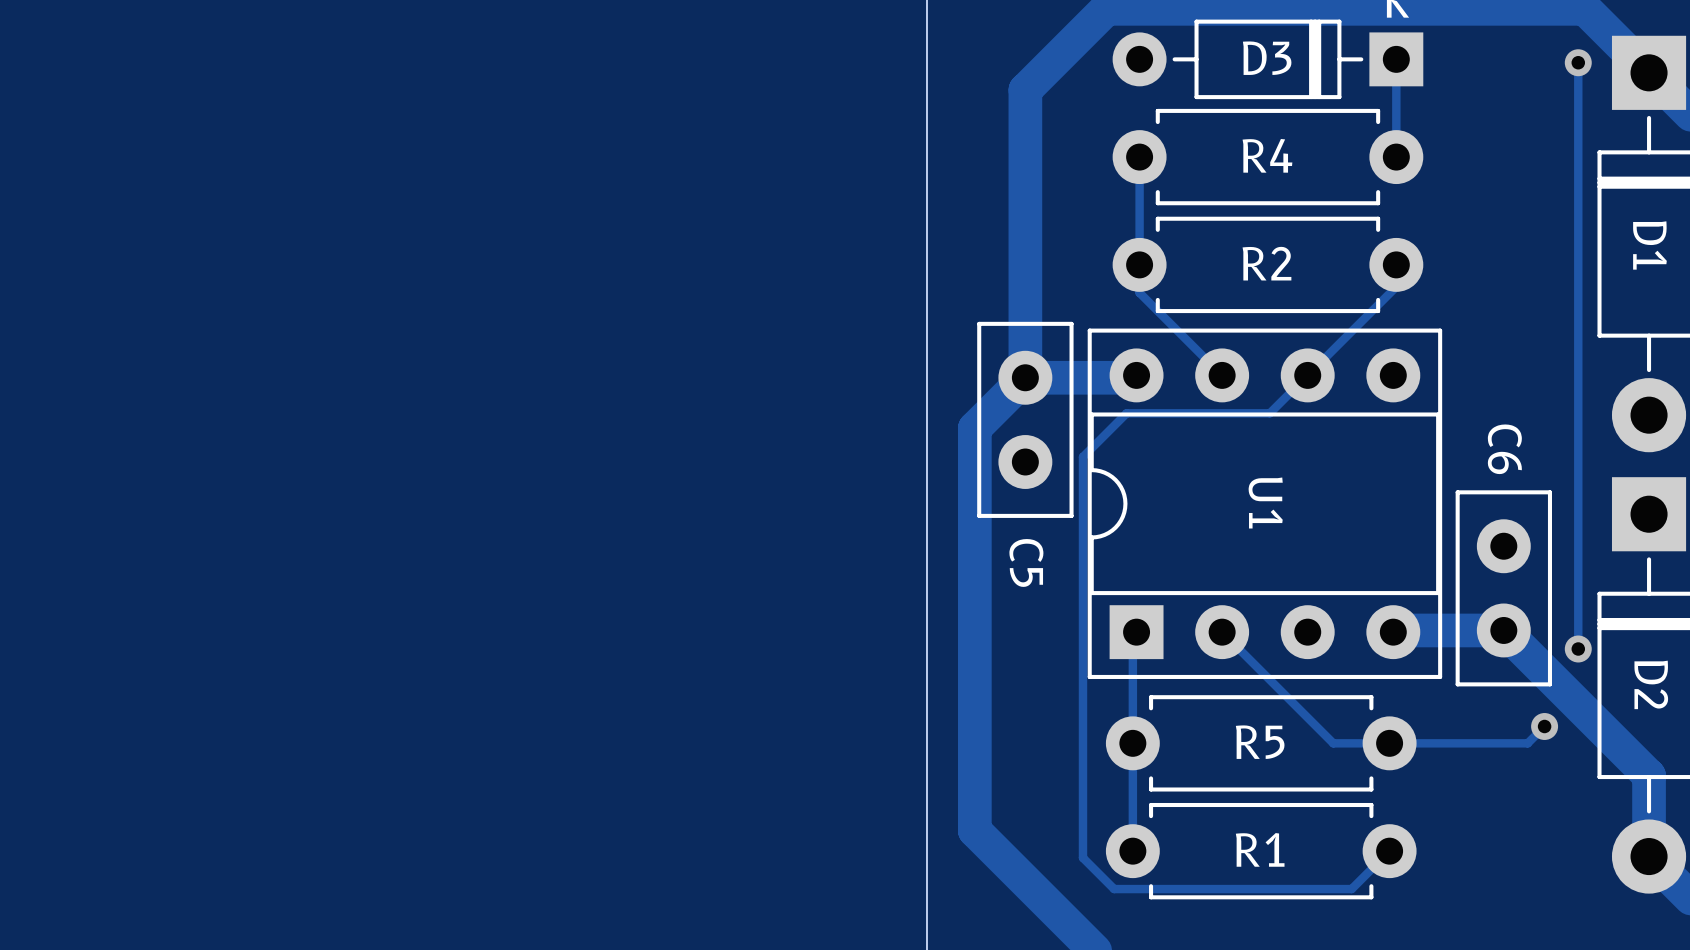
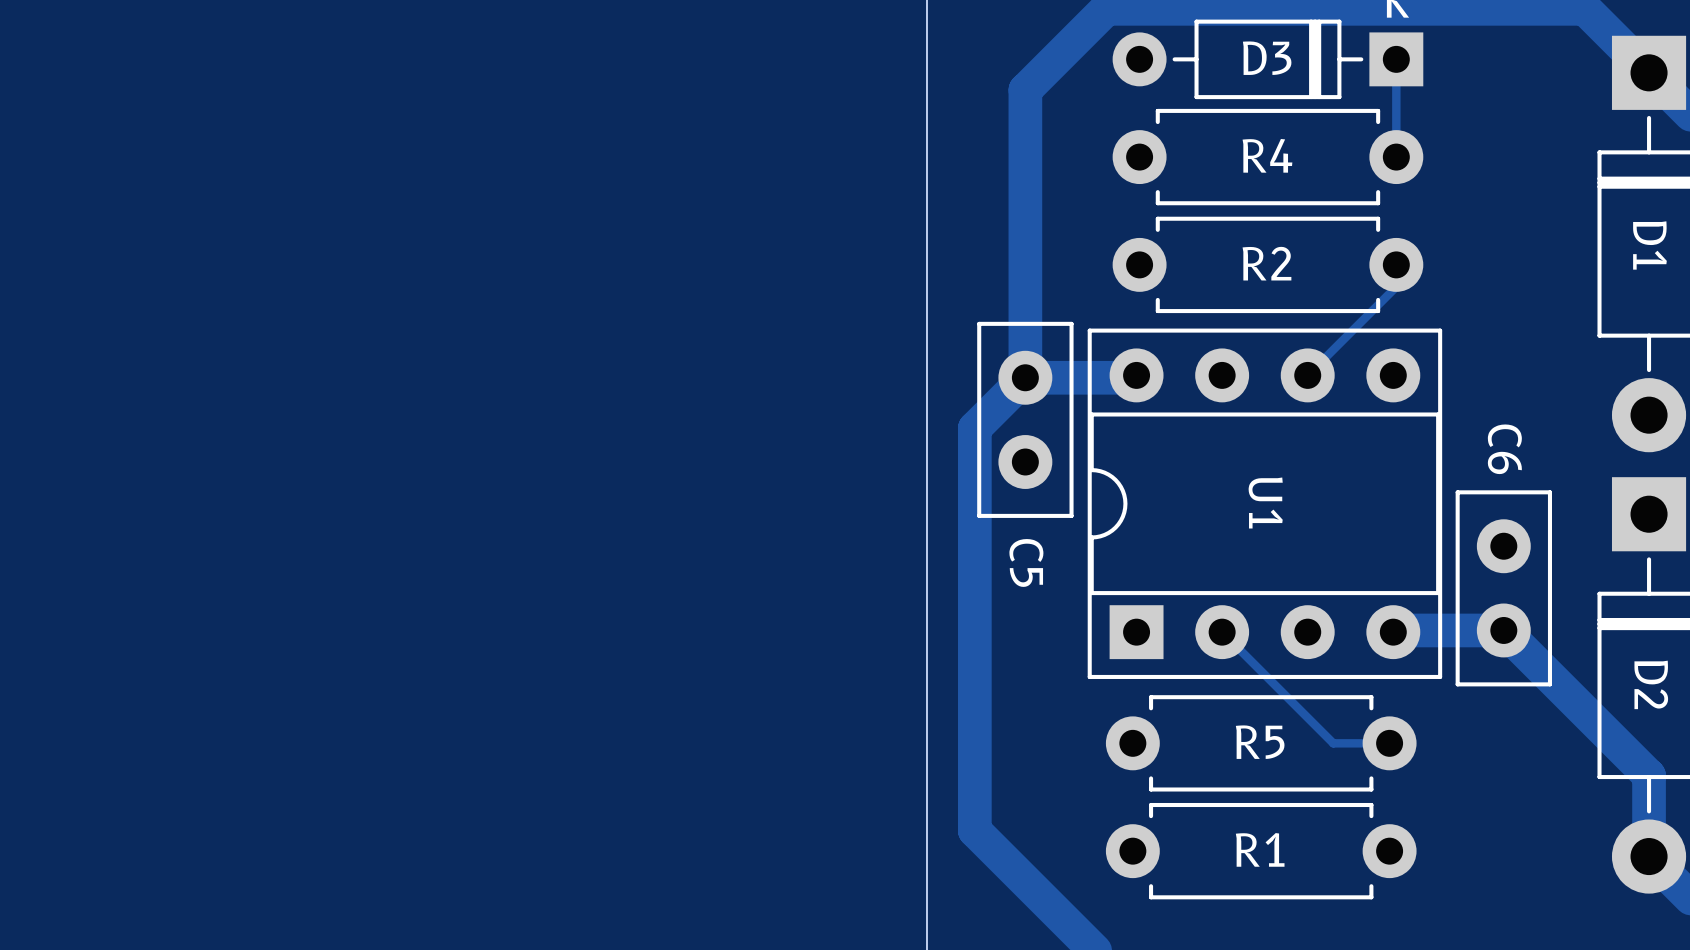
track: (1578, 62) (1578, 649) -> none
via: (1578, 62) -> none
track: (1139, 157) (1139, 292) (1222, 375) -> none
track: (1307, 375) (1269, 413) (1126, 413) (1082, 456) (1082, 857) (1114, 889) (1351, 889) (1389, 851) -> none
track: (1136, 632) (1132, 635) (1132, 851) -> none
via: (1578, 649) -> none
track: (1544, 726) (1527, 743) (1389, 743) -> none
via: (1544, 726) -> none

